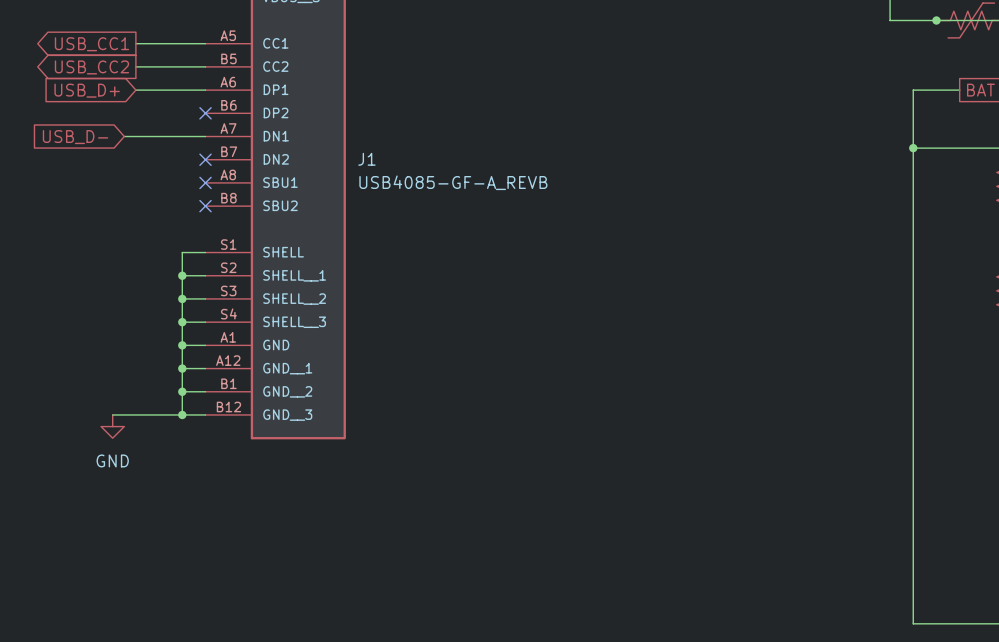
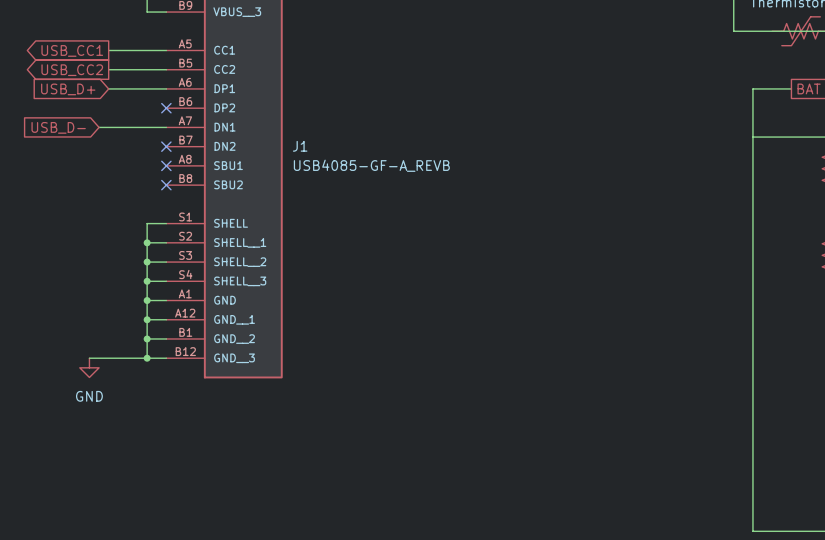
junction: (936, 20) -> none
junction: (913, 148) -> none

